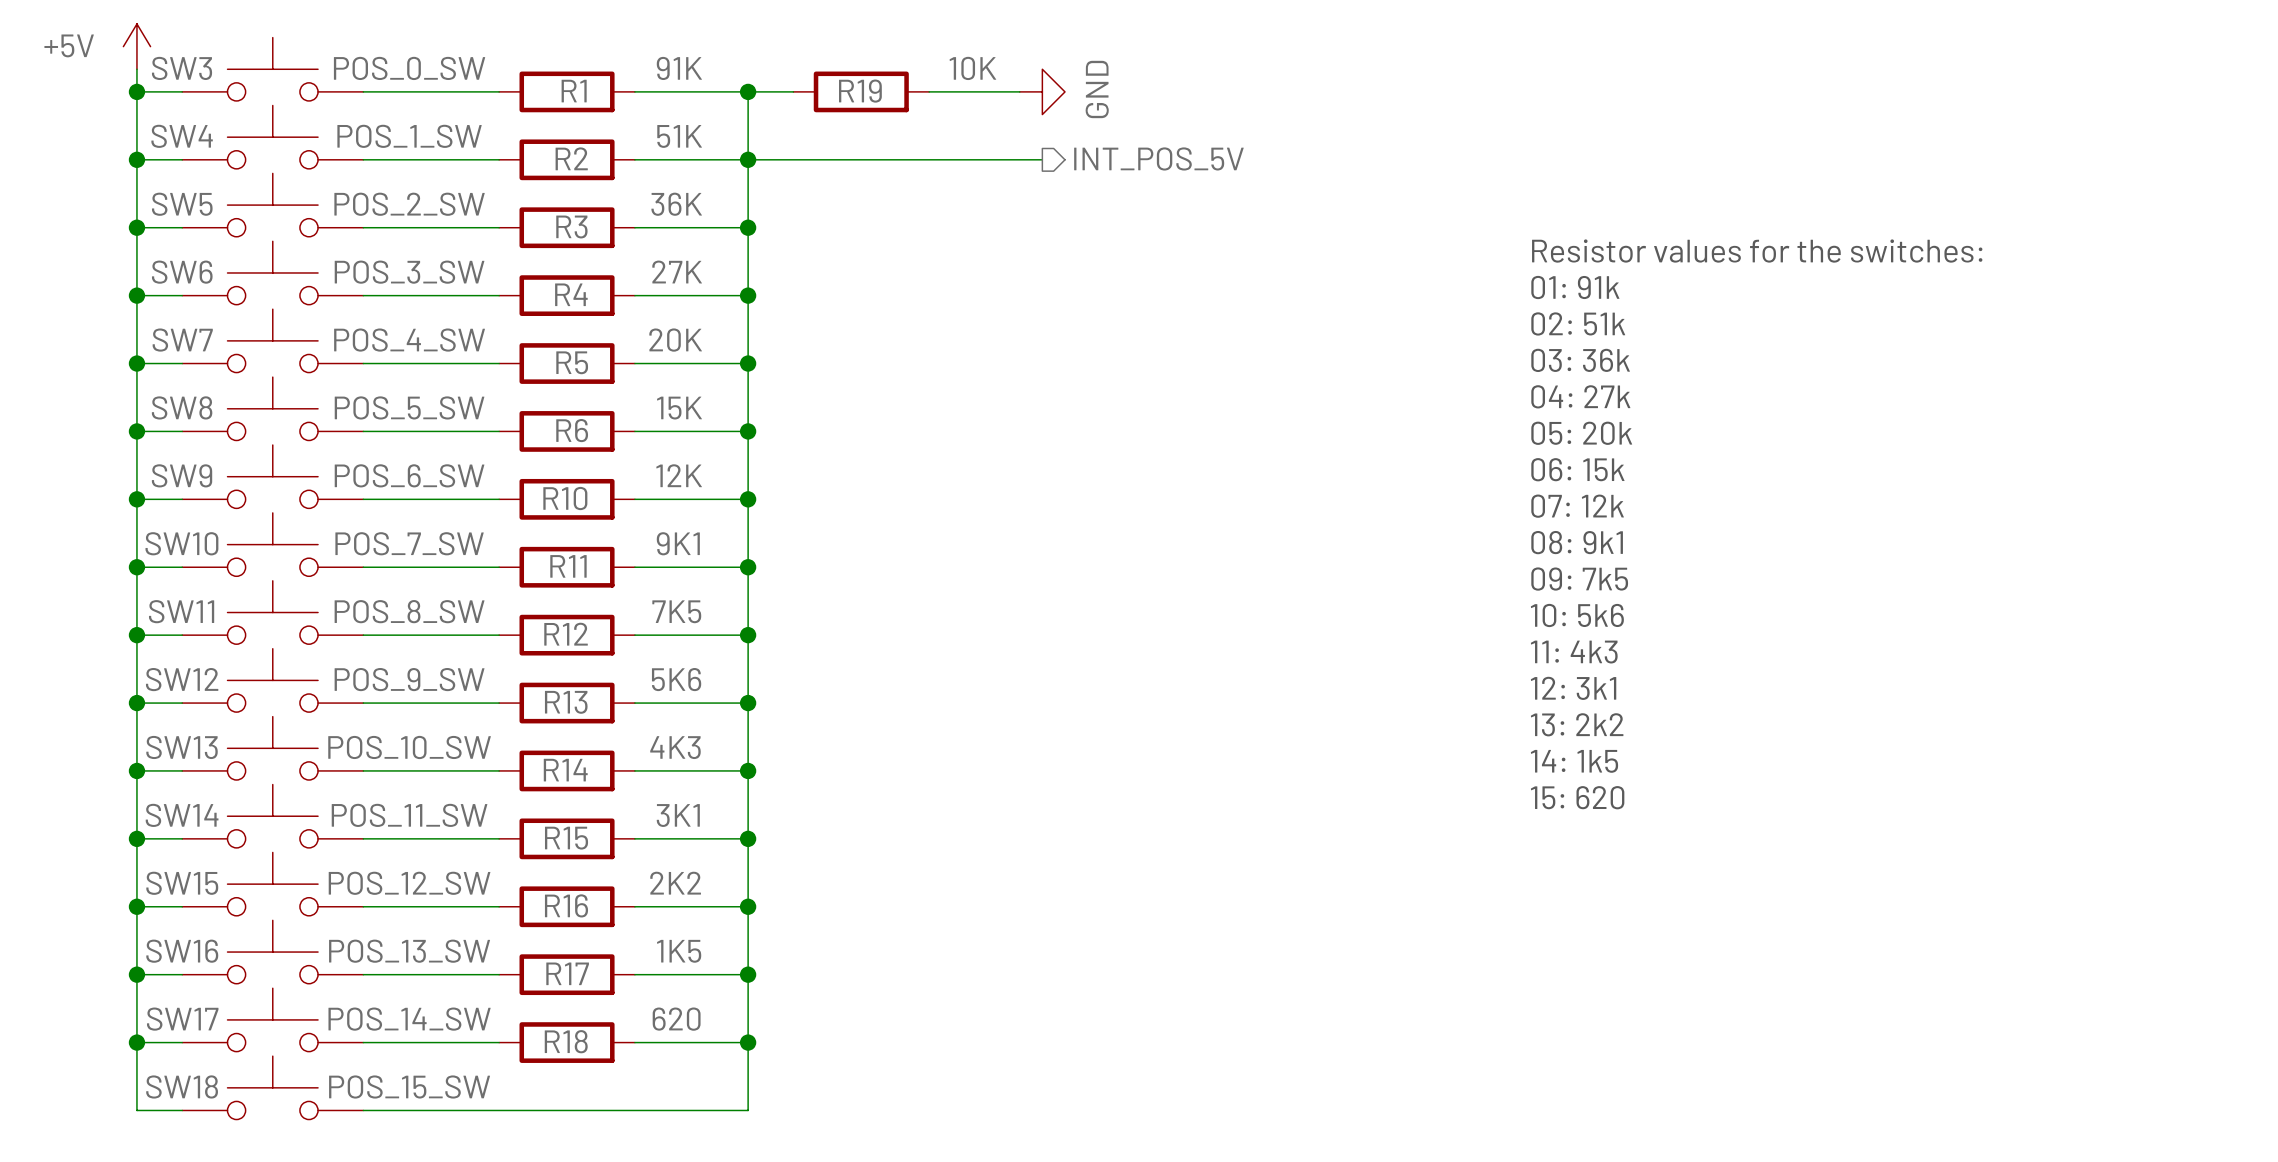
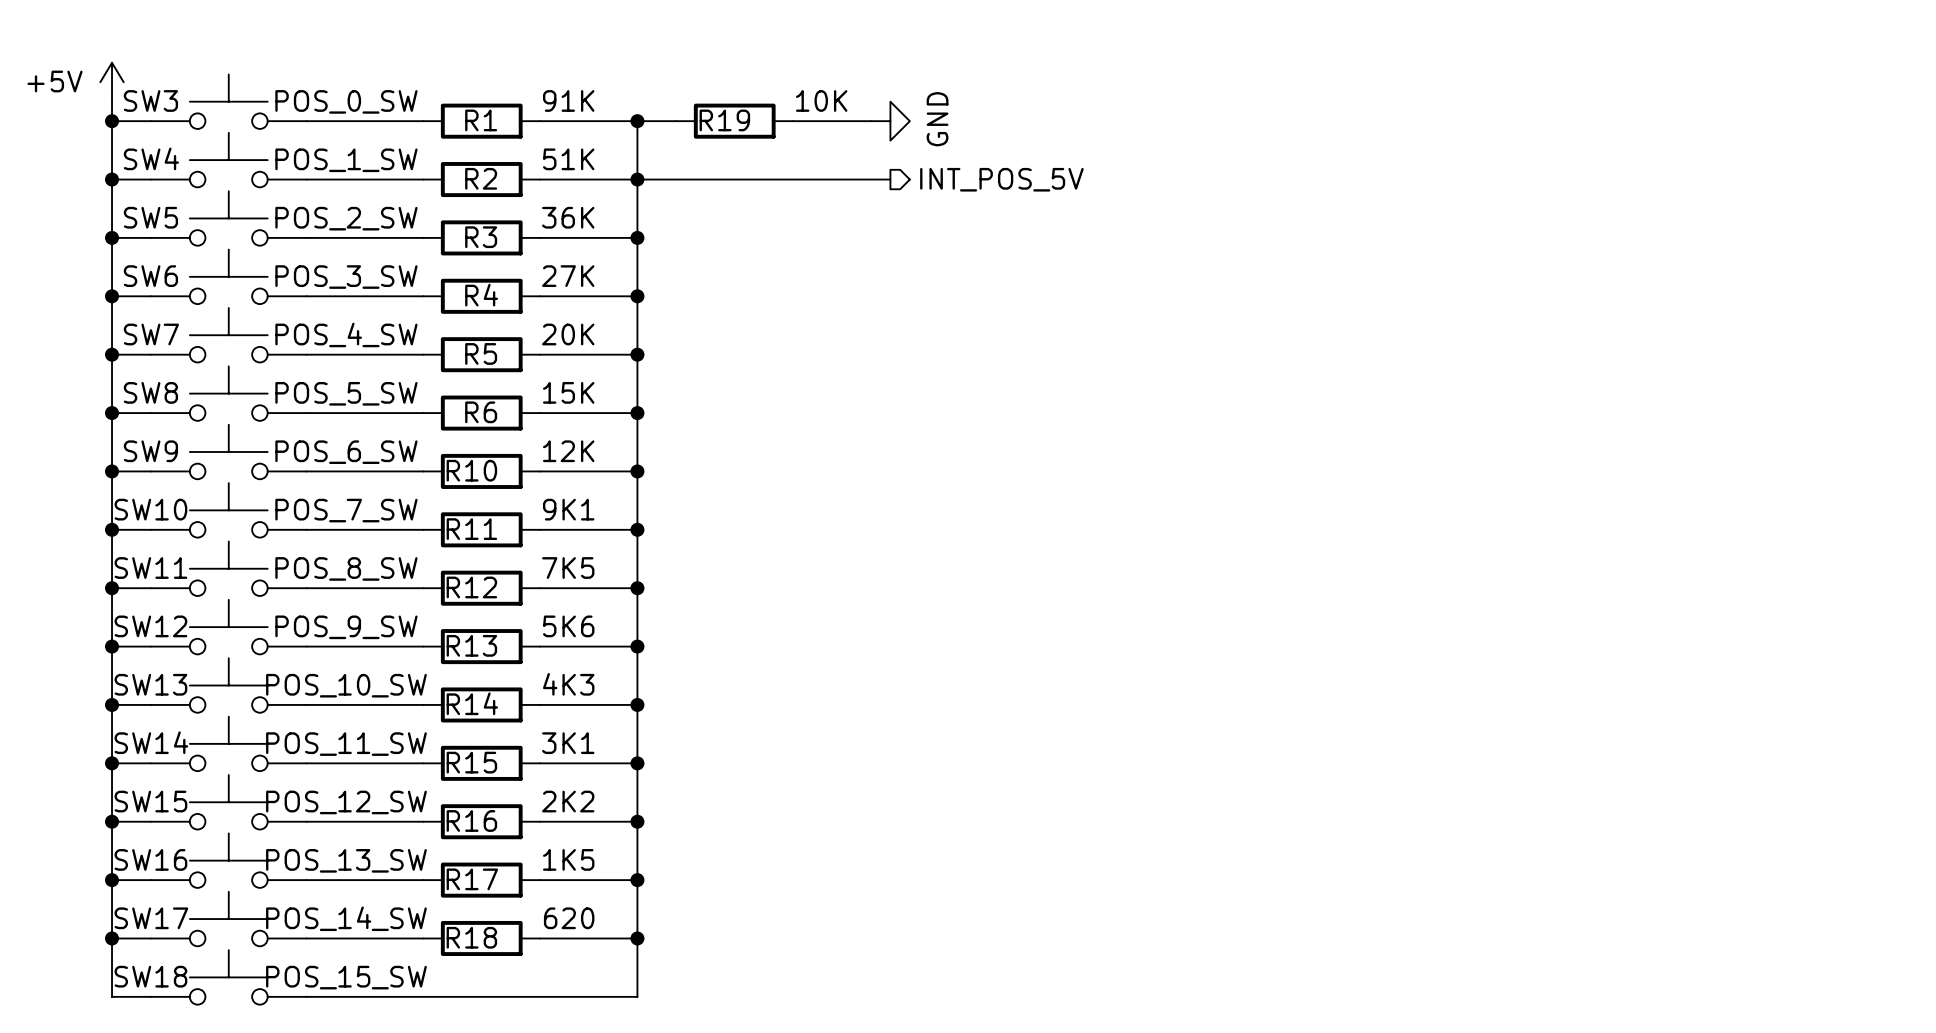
text: Resistor values for the switches: (1757, 251) -> none
text: 01: 91k (1575, 287) -> none
text: 02: 51k (1578, 323) -> none
text: 03: 36k (1580, 360) -> none
text: 04: 27k (1580, 396) -> none
text: 05: 20k (1581, 433) -> none
text: 06: 15k (1577, 469) -> none
text: 07: 12k (1577, 506) -> none
text: 08: 9k1 (1577, 542) -> none
text: 09: 7k5 (1579, 579) -> none
text: 10: 5k6 (1577, 615) -> none
text: 11: 4k3 (1574, 652) -> none
text: 12: 3k1 (1573, 688) -> none
text: 13: 2k2 (1577, 724) -> none
text: 14: 1k5 (1574, 761) -> none
text: 15: 620 (1577, 797) -> none

